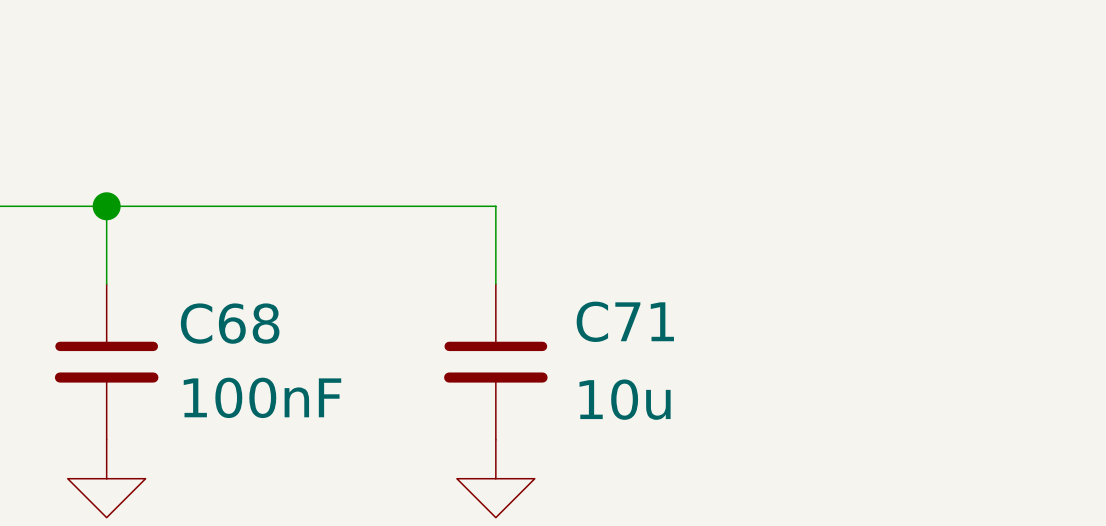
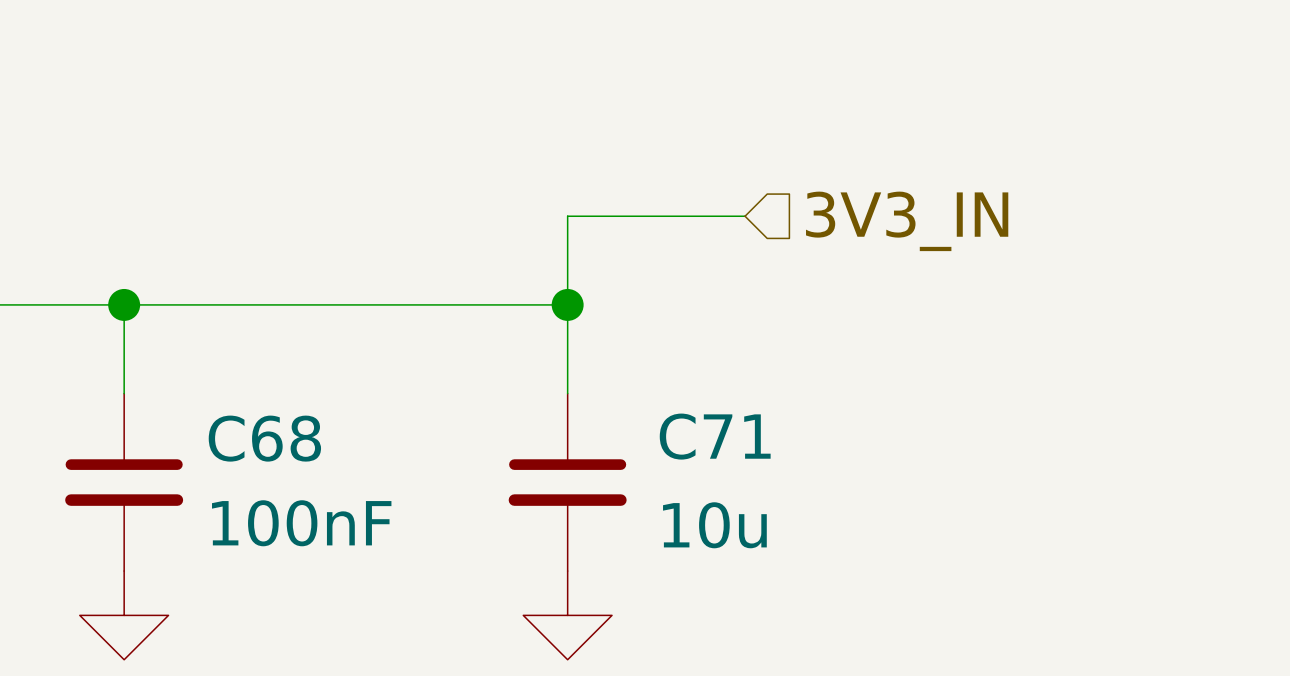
wire: none -> (745, 216) (567, 216) (567, 304)
hierarchical label: none -> 3V3_IN (907, 221)
junction: none -> (567, 304)

